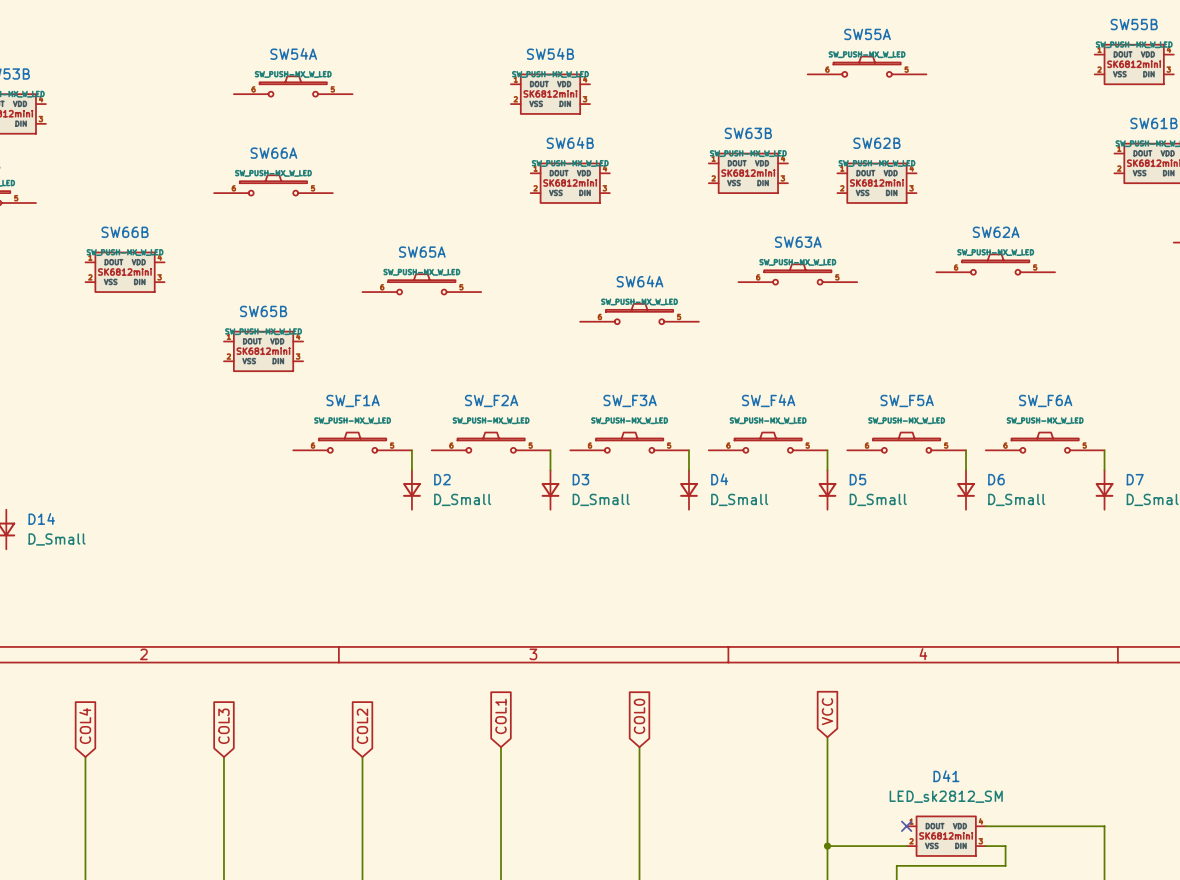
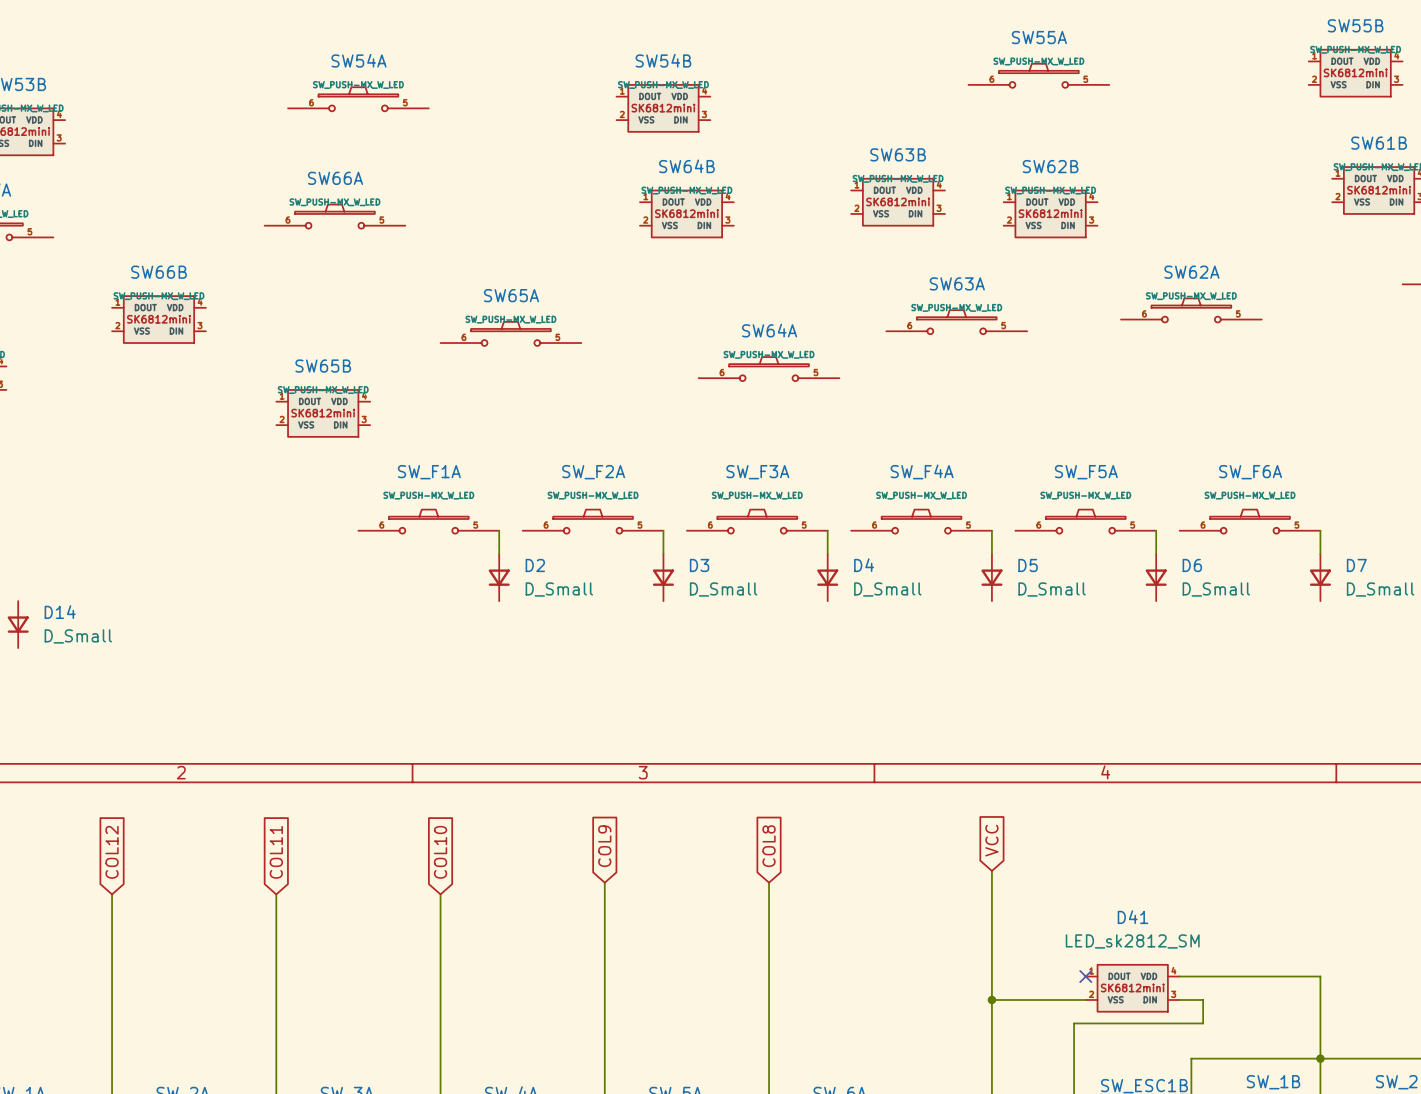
global label: COL1 (501, 716) -> COL9 (604, 846)
global label: COL0 (639, 716) -> COL8 (769, 846)
global label: COL4 (85, 726) -> COL12 (112, 852)
global label: COL3 (223, 726) -> COL11 (276, 852)
global label: COL2 (362, 726) -> COL10 (440, 852)

